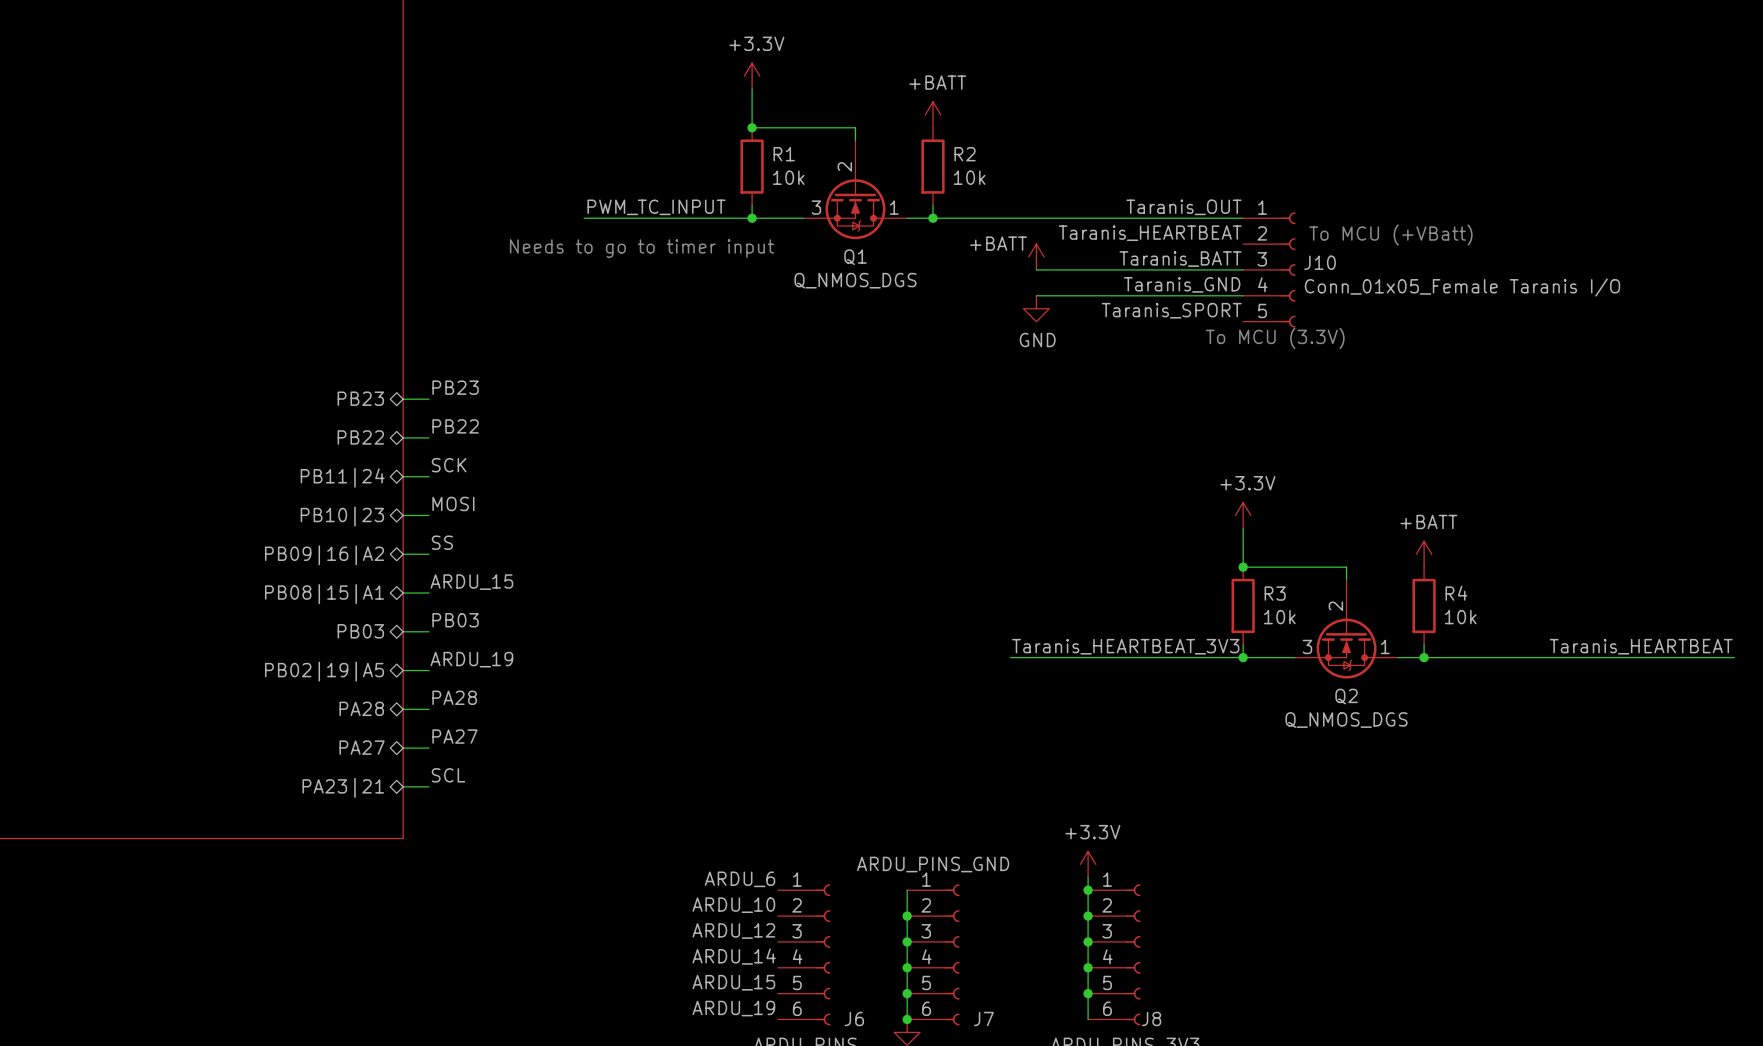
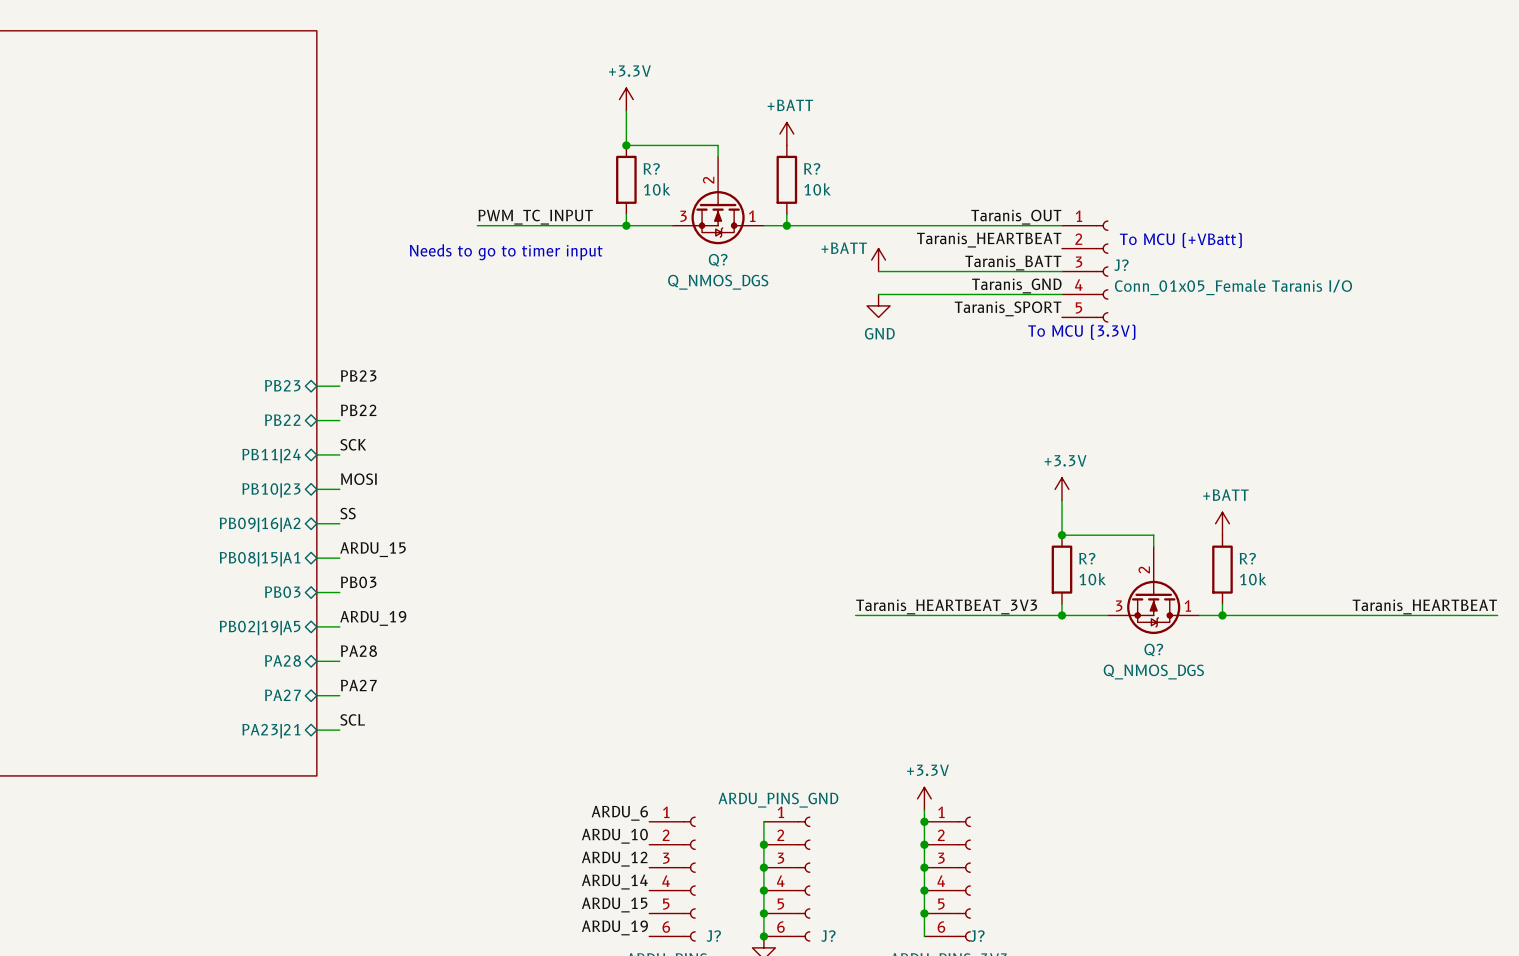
R1 name: R1 (784, 154) -> R? (651, 168)
R2 name: R2 (965, 154) -> R? (812, 168)
Q1 name: Q1 (855, 257) -> Q? (718, 260)
J10 name: J10 (1320, 262) -> J? (1121, 265)
R3 name: R3 (1275, 593) -> R? (1087, 558)
R4 name: R4 (1456, 593) -> R? (1247, 558)
Q2 name: Q2 (1346, 696) -> Q? (1153, 649)
J6 name: J6 (854, 1018) -> J? (713, 936)
J7 name: J7 (983, 1018) -> J? (828, 936)
J8 name: J8 (1151, 1018) -> J? (977, 936)

